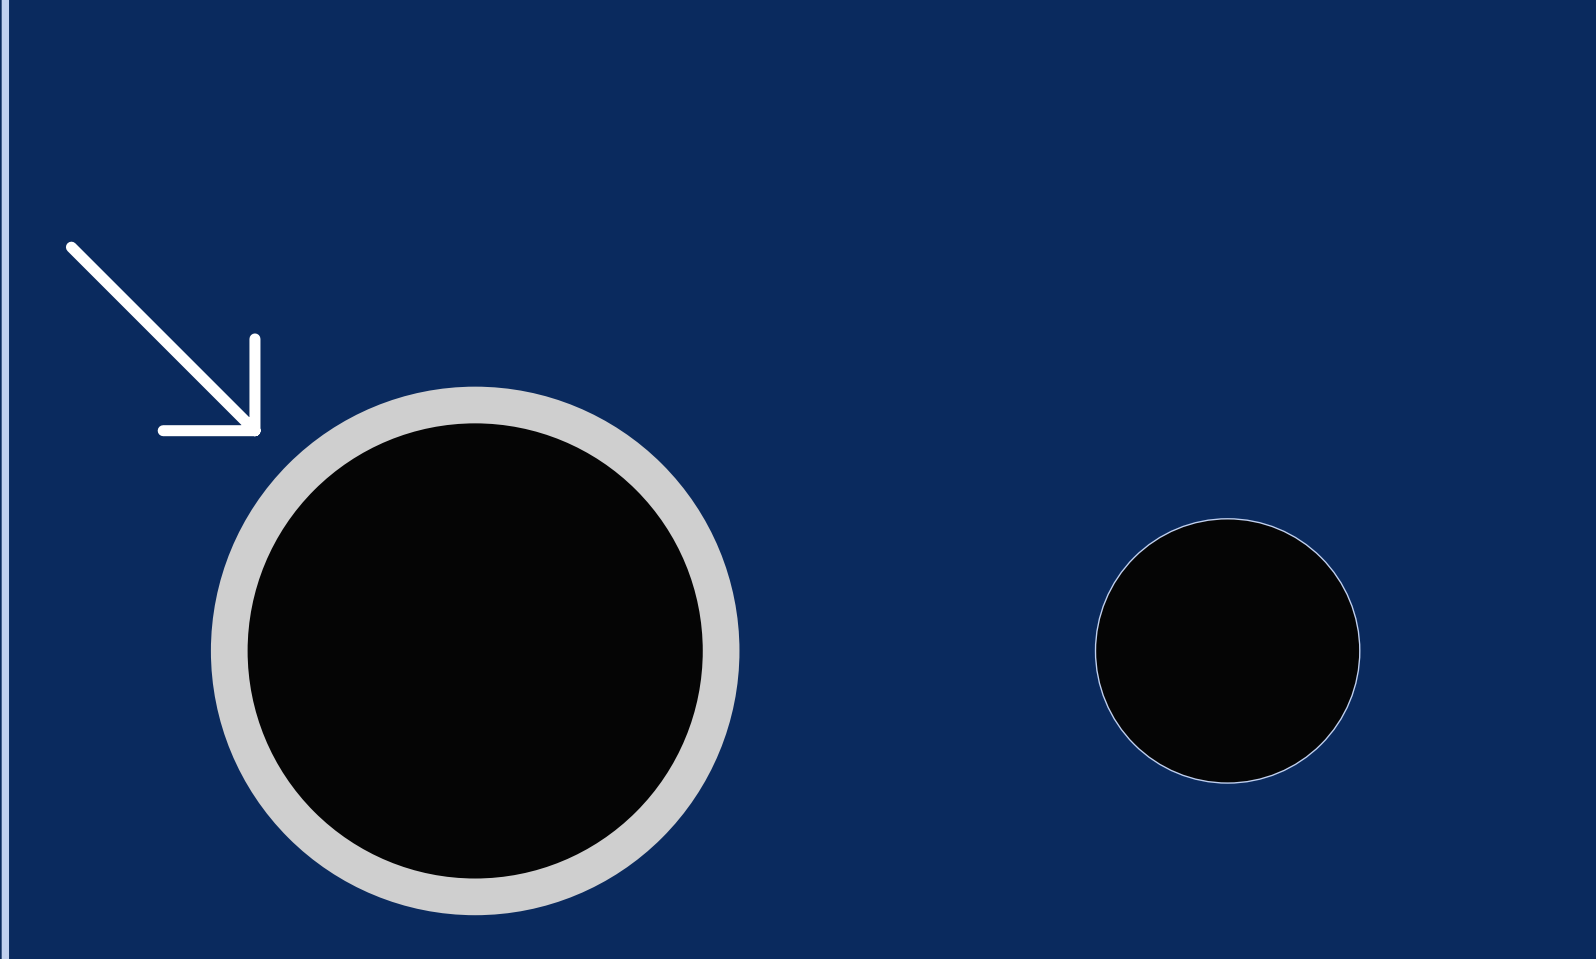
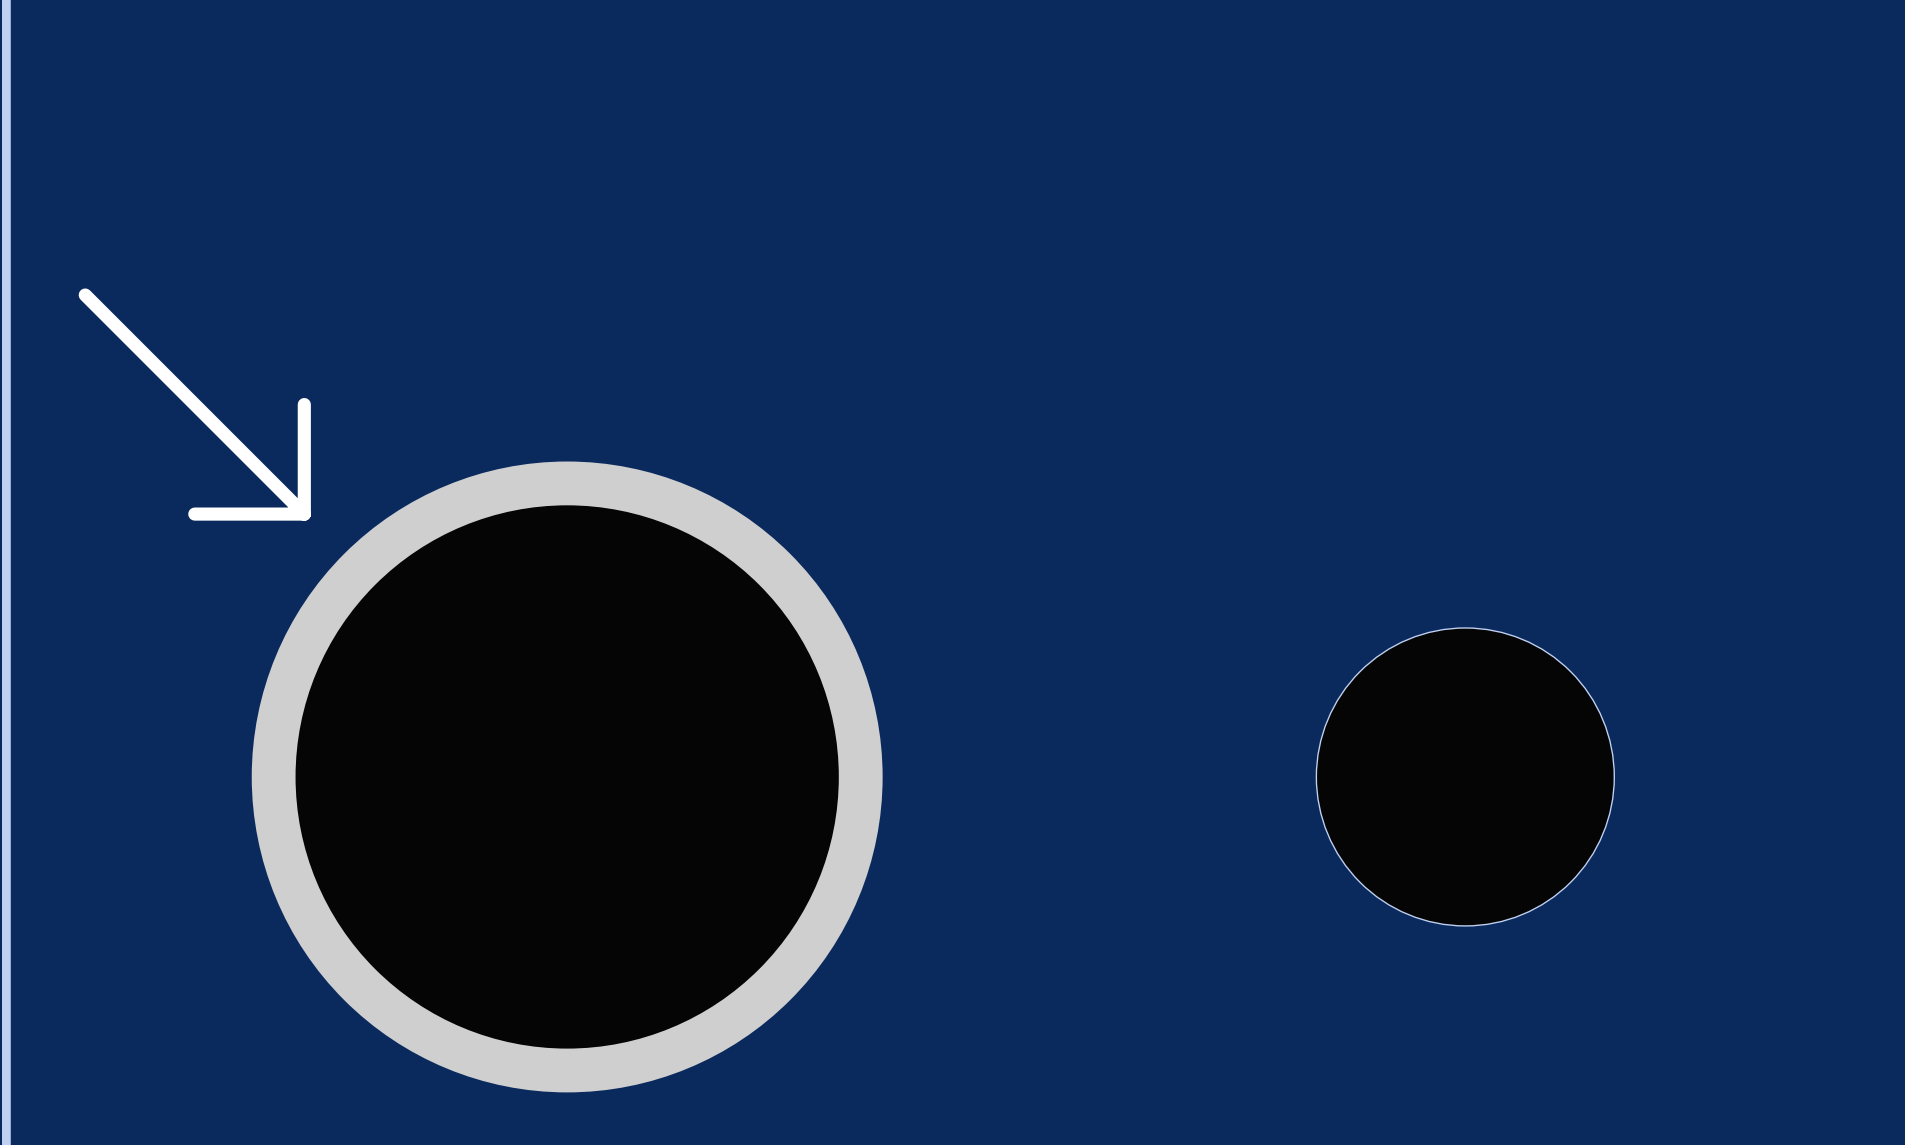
part footprint: [1095, 518, 1360, 784] -> [1316, 627, 1615, 926]

